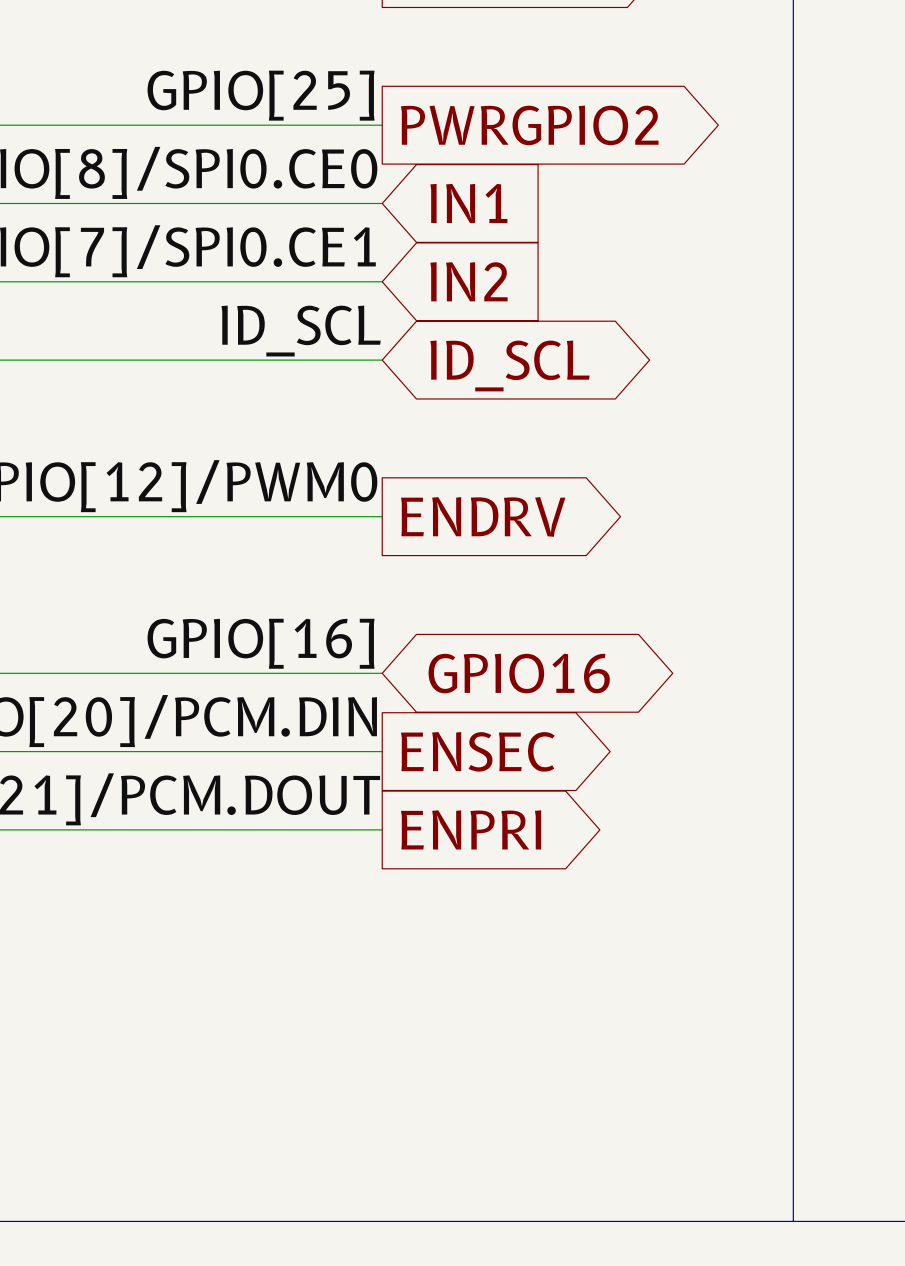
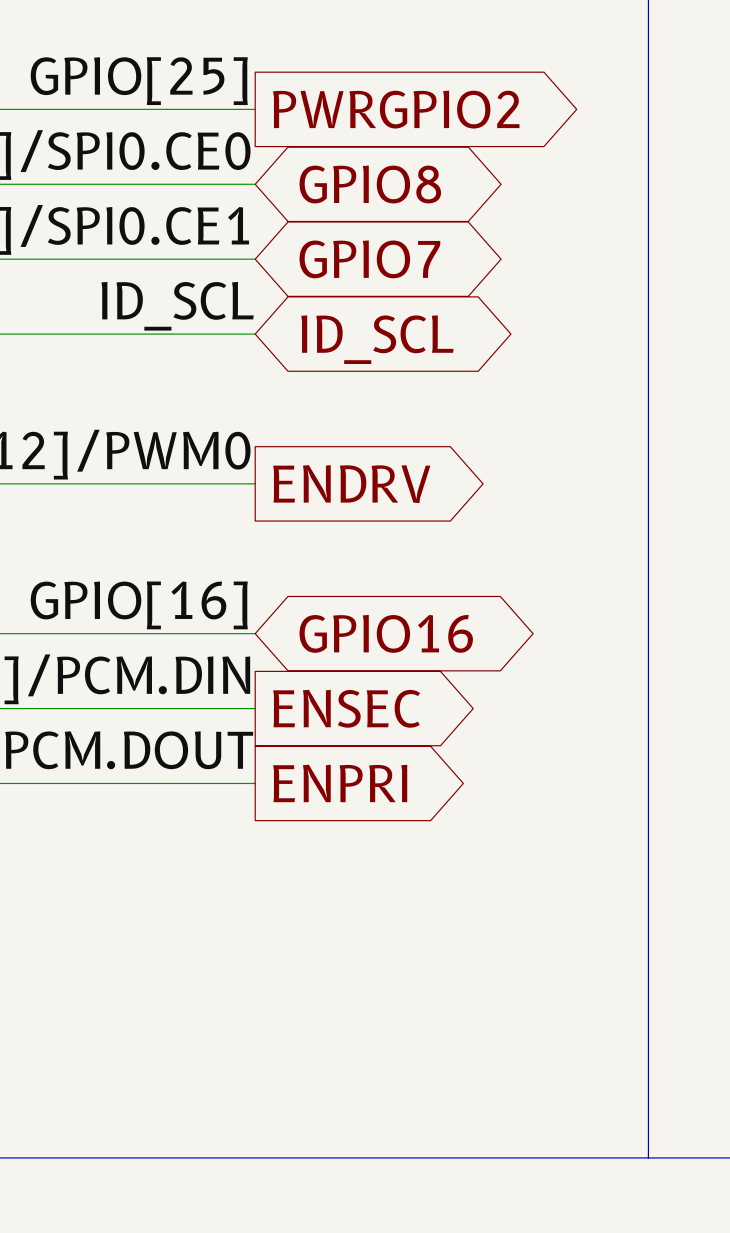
global label shape: input (468, 203) -> bidirectional (370, 184)
global label: IN1 (468, 203) -> GPIO8 (370, 184)
global label shape: input (468, 281) -> bidirectional (369, 259)
global label: IN2 (468, 281) -> GPIO7 (369, 259)

